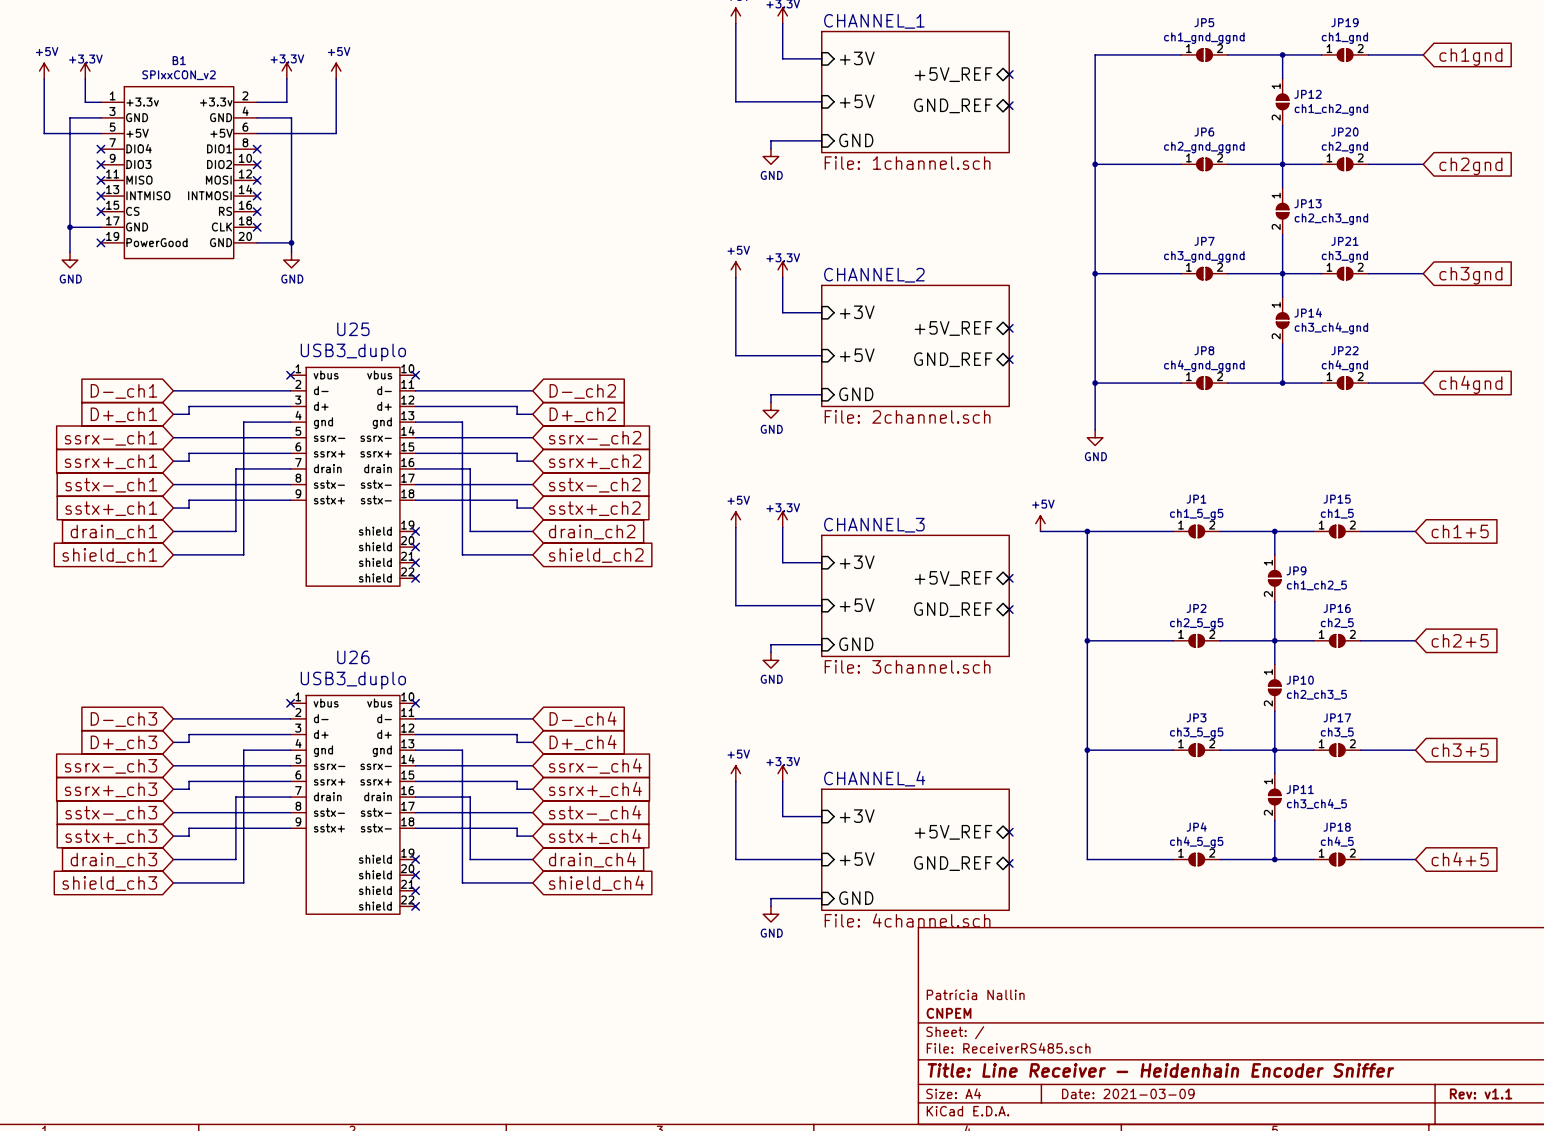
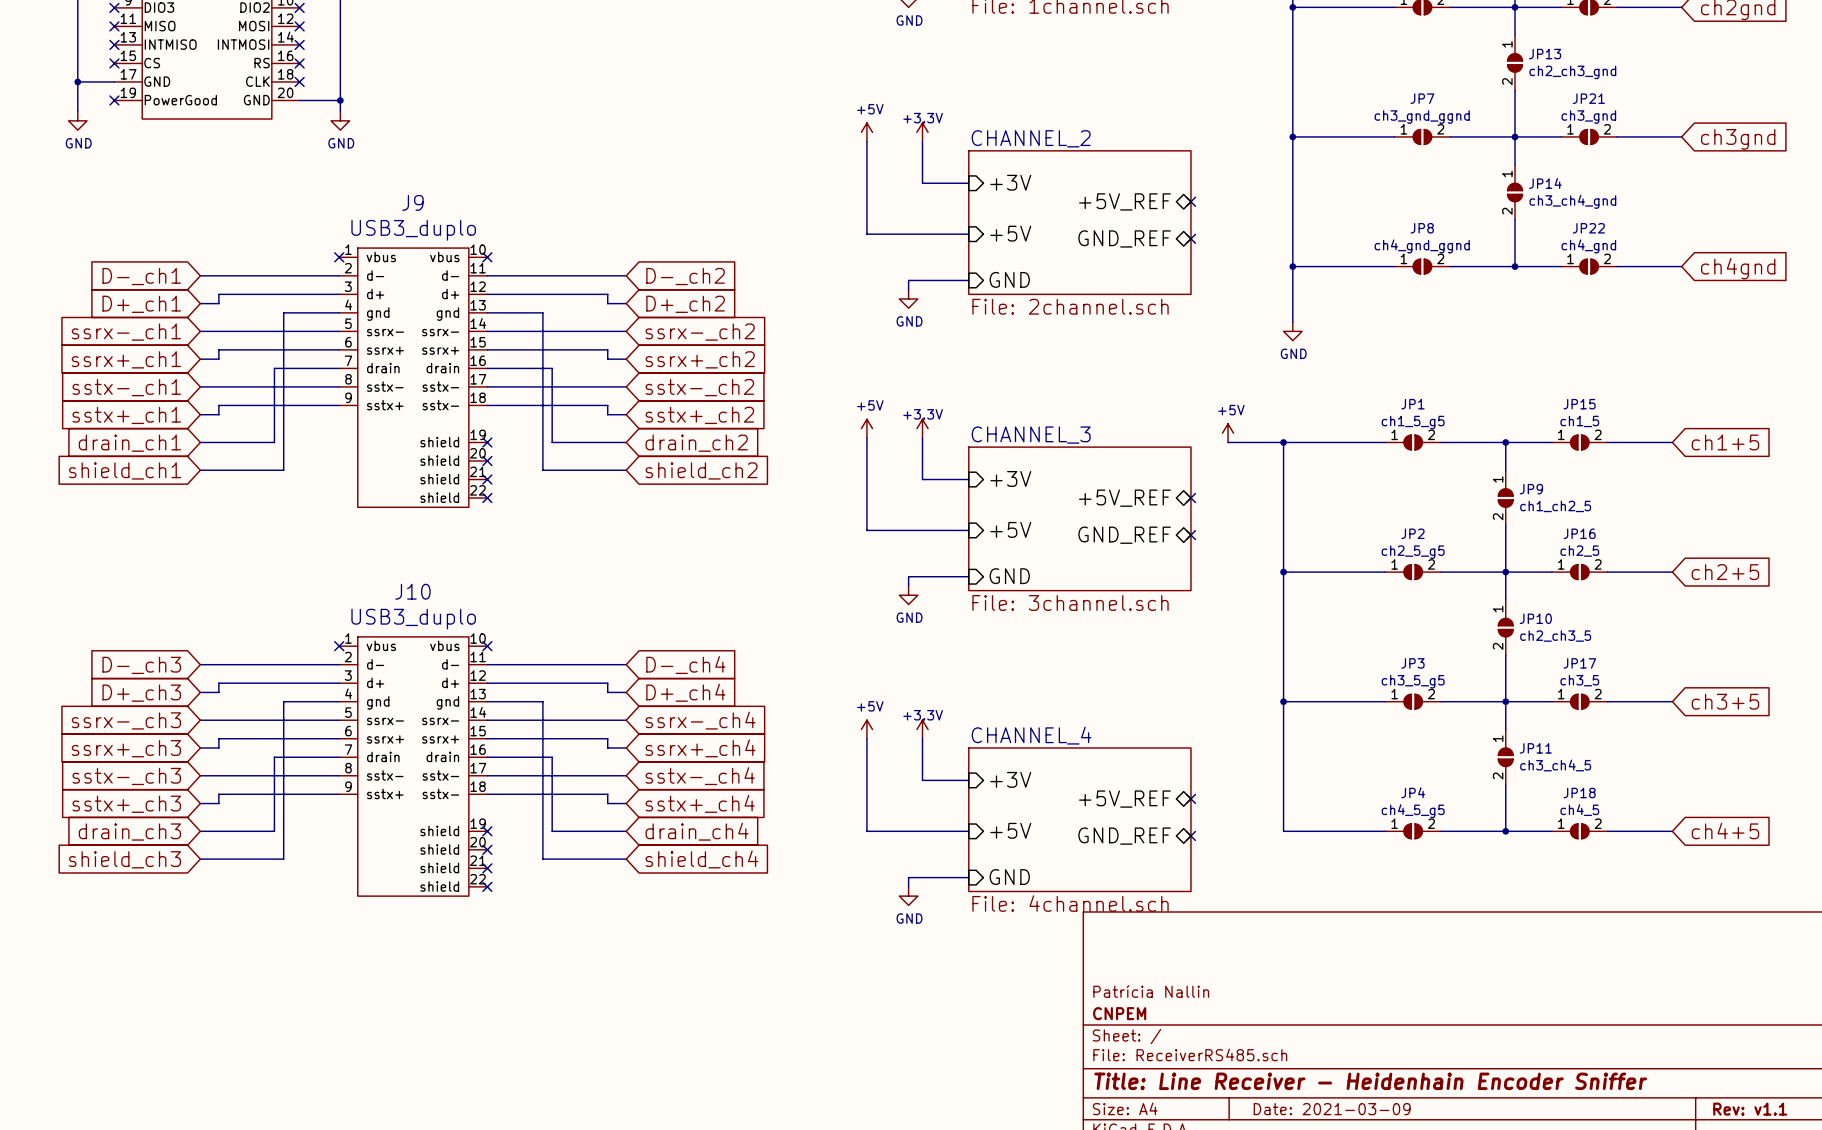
U25 name: U25 (353, 329) -> J9 (412, 202)
U26 name: U26 (353, 657) -> J10 (412, 591)

